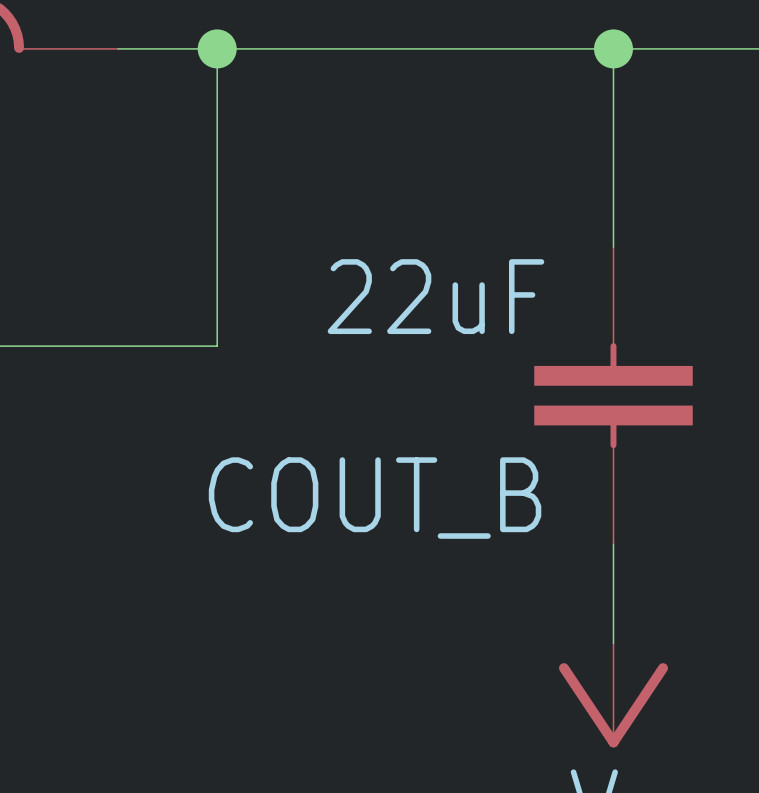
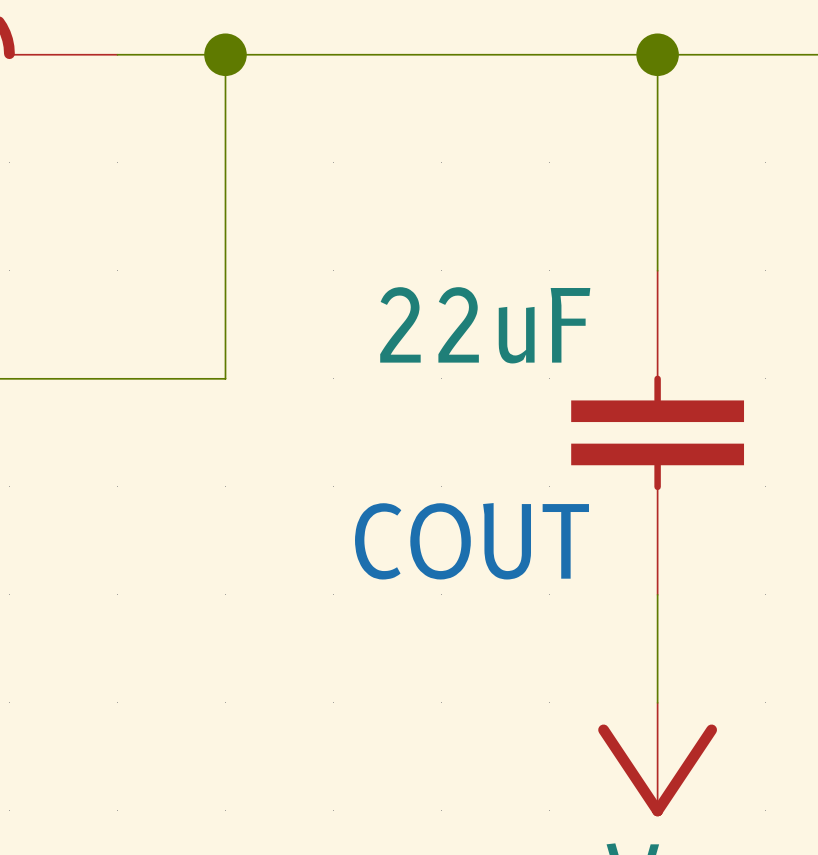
COUT_B name: COUT_B (375, 498) -> COUT (471, 541)

